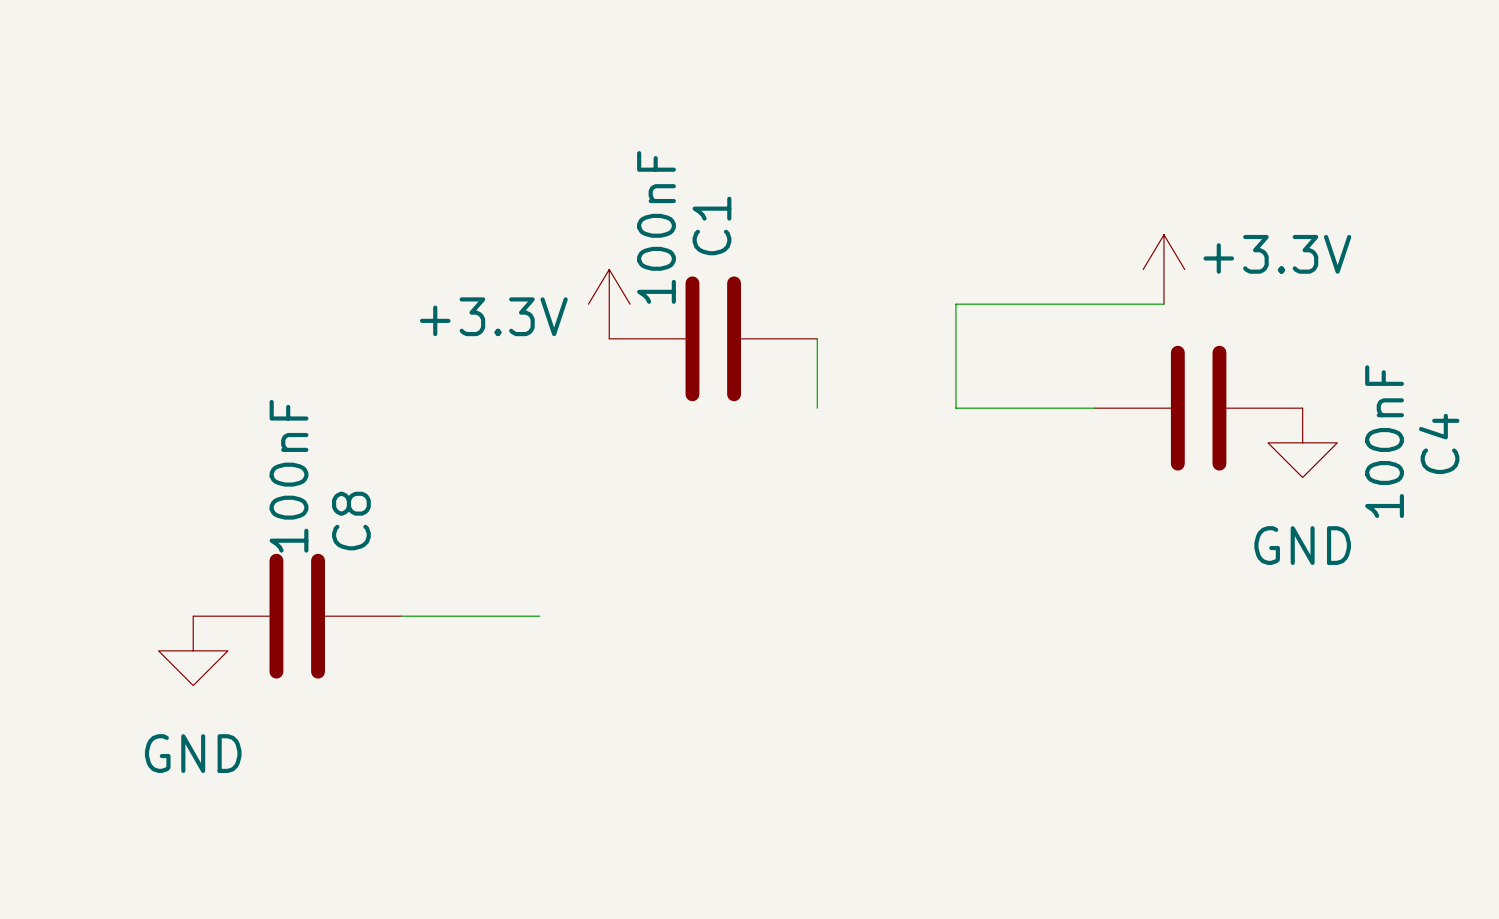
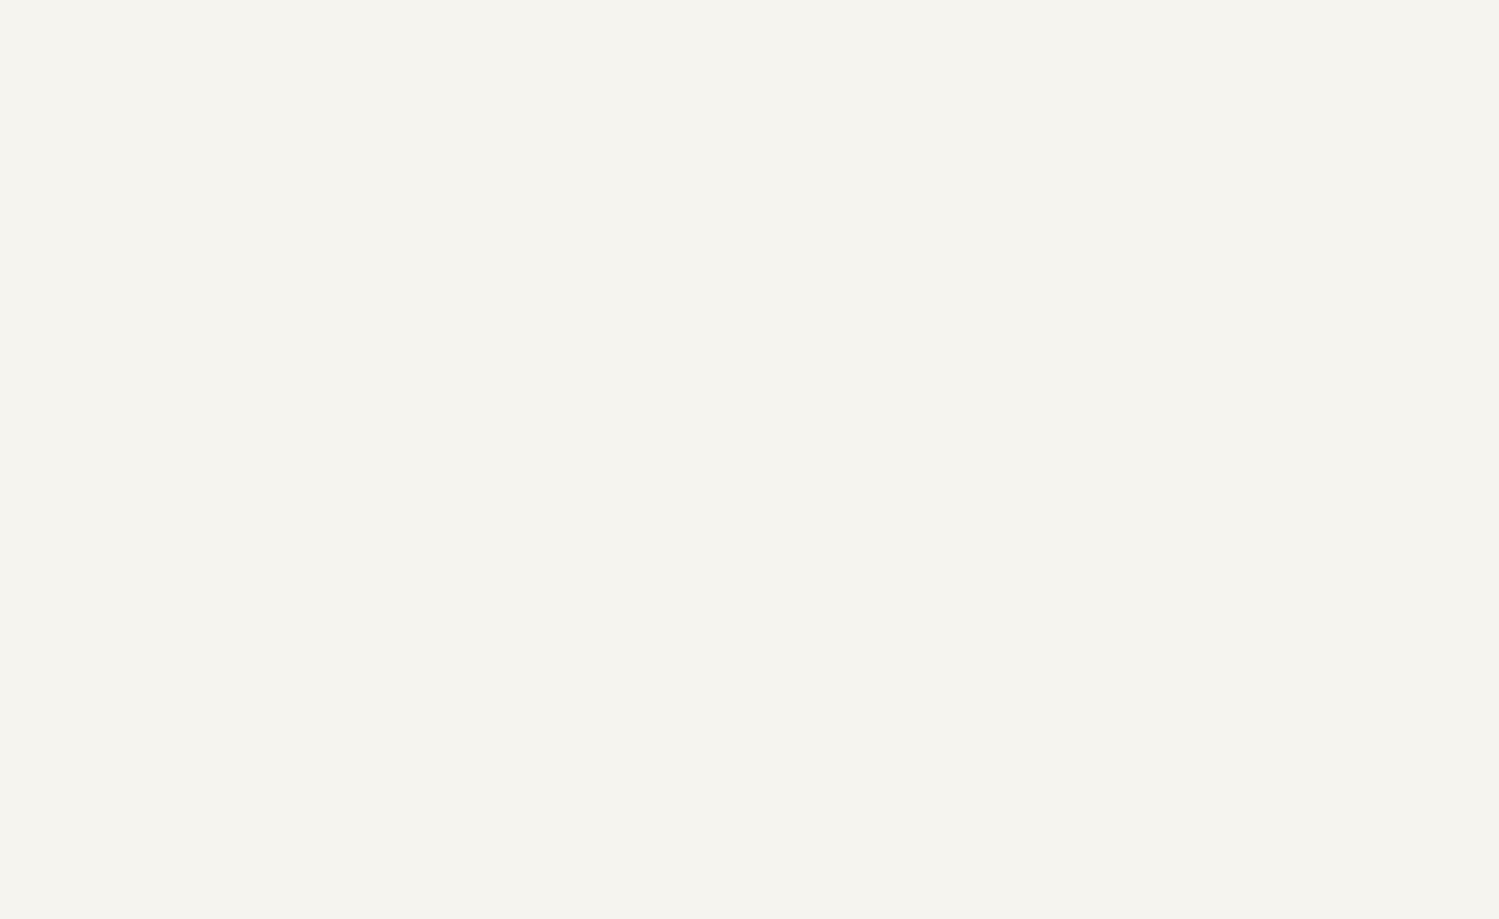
power symbol: +3.3V (1163, 269) -> none
power symbol: +3.3V (609, 304) -> none
wire: (1163, 304) (955, 304) (955, 408) (1094, 408) -> none
C1: 100nF (713, 338) -> none
wire: (817, 338) (817, 408) -> none
C4: 100nF (1198, 408) -> none
power symbol: GND (1302, 442) -> none
C8: 100nF (297, 616) -> none
wire: (401, 616) (539, 616) -> none
power symbol: GND (193, 650) -> none

